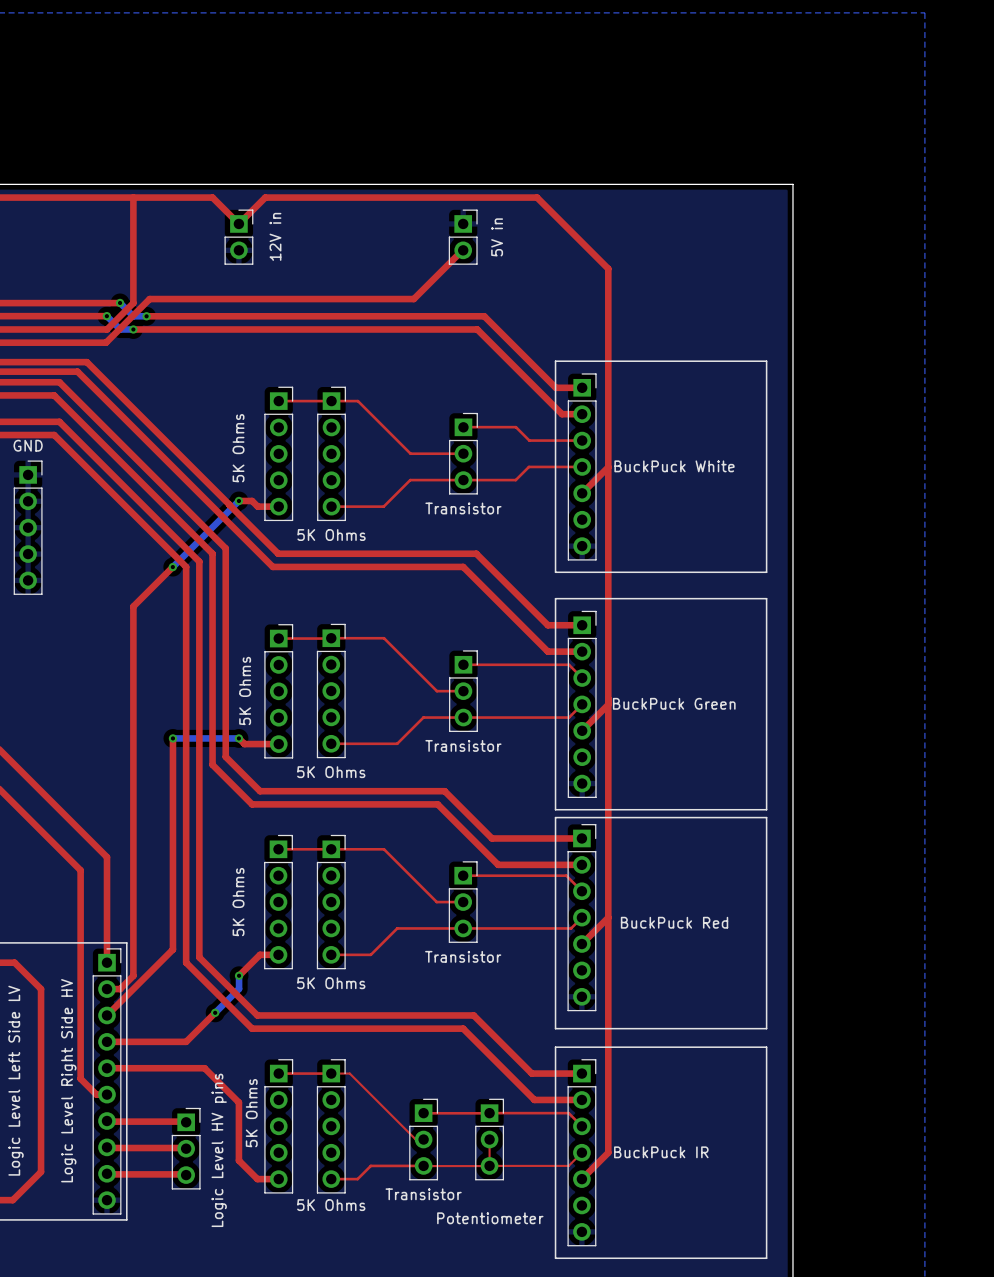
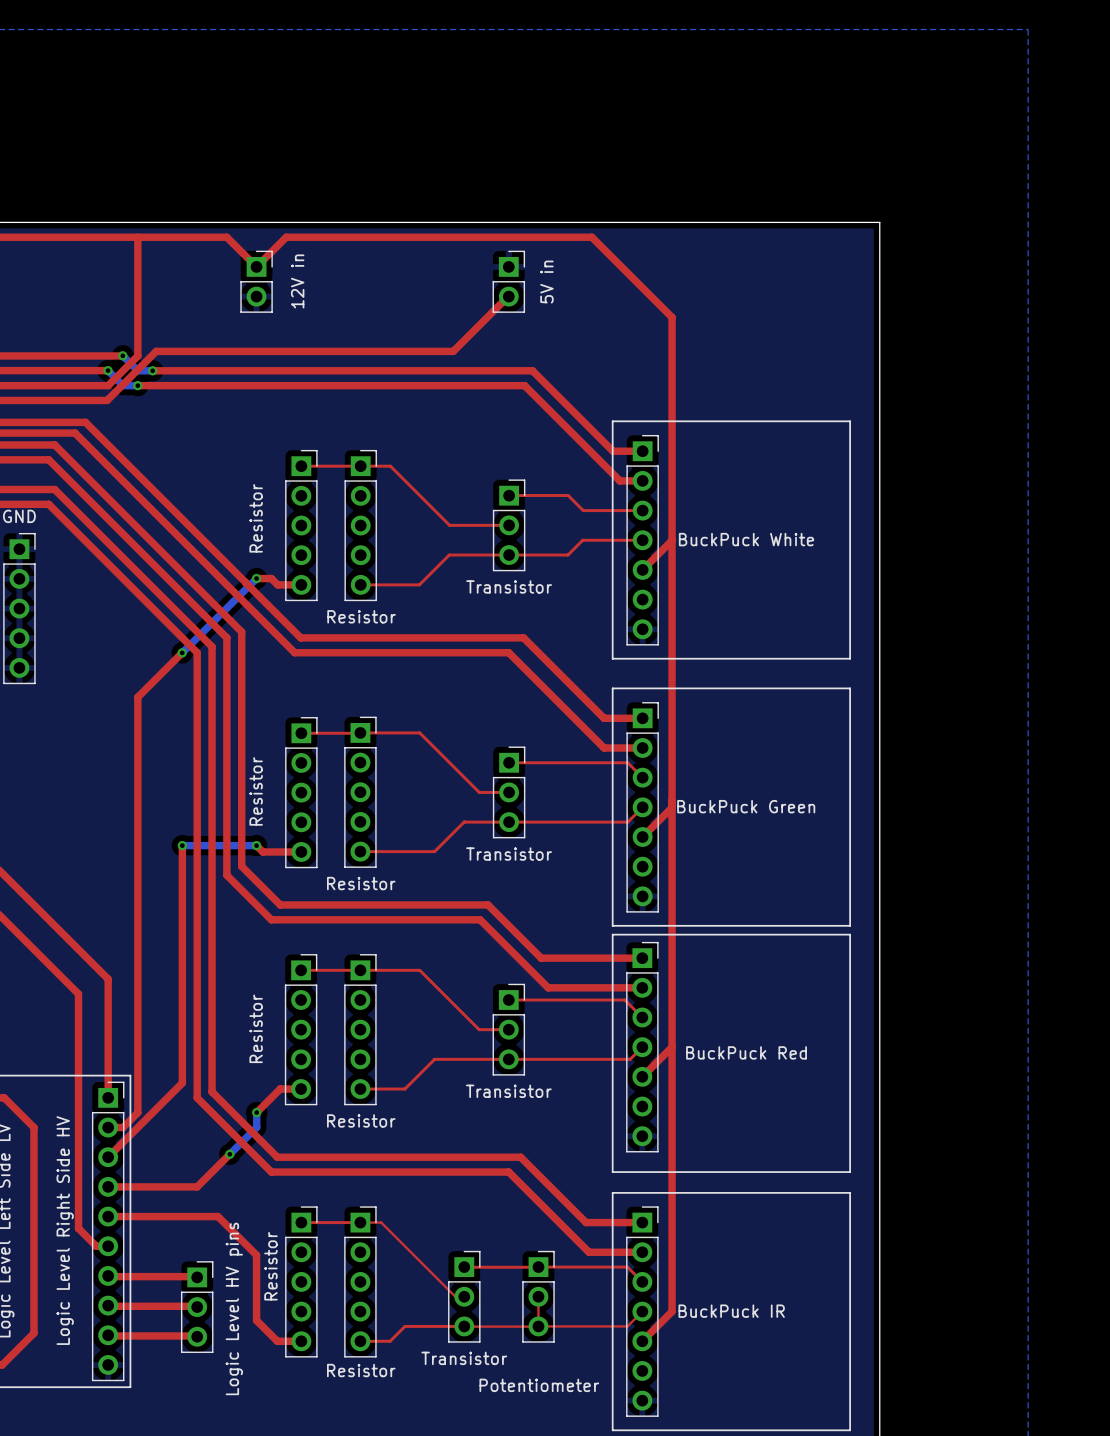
part value: 5K Ohms (238, 448) -> Resistor (256, 518)
part value: 5K Ohms (331, 535) -> Resistor (361, 616)
part value: 5K Ohms (245, 691) -> Resistor (256, 791)
part value: 5K Ohms (331, 772) -> Resistor (361, 883)
part value: 5K Ohms (238, 902) -> Resistor (256, 1028)
part value: 5K Ohms (331, 983) -> Resistor (361, 1120)
part value: 5K Ohms (251, 1113) -> Resistor (270, 1266)
part value: 5K Ohms (331, 1205) -> Resistor (361, 1370)

